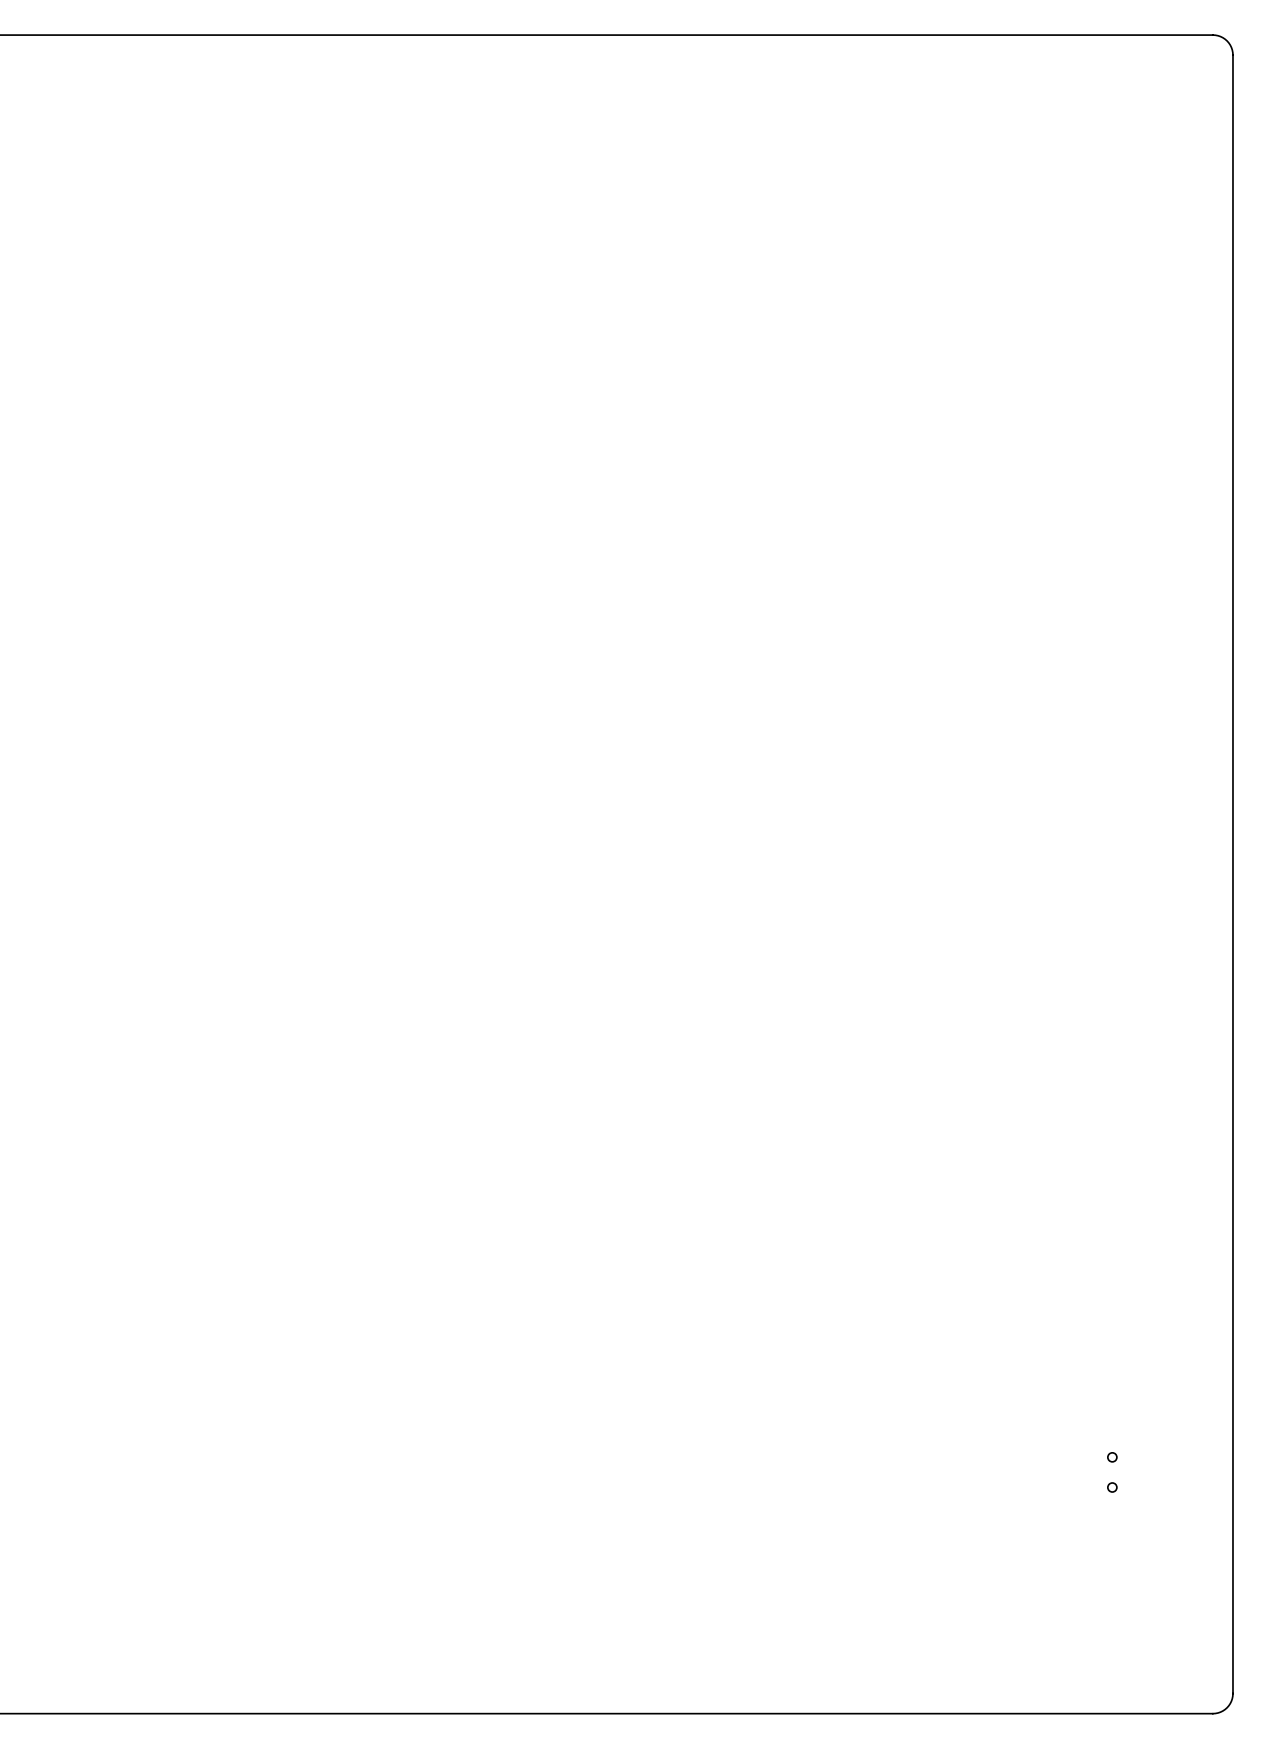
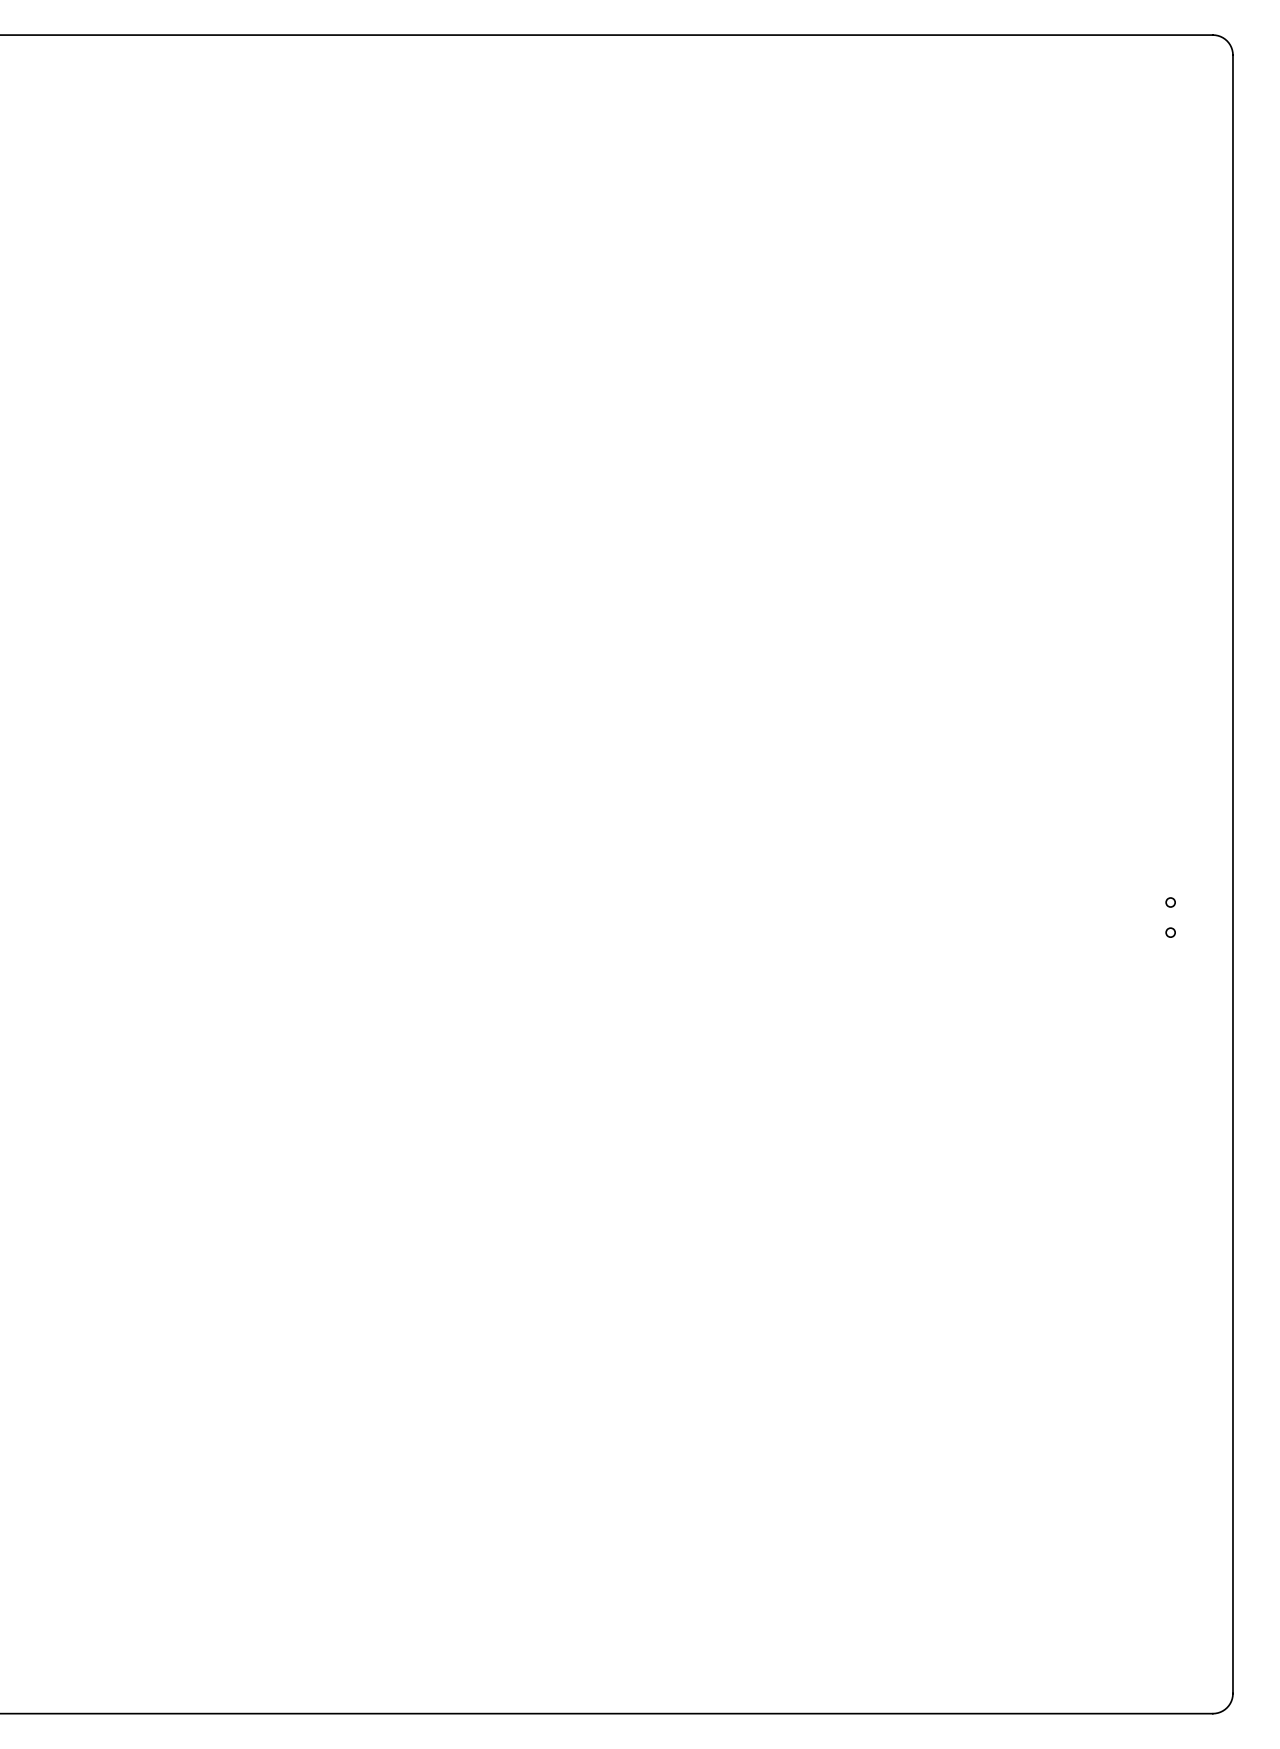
part: none -> (1170, 917)
part: (1112, 1472) -> none

